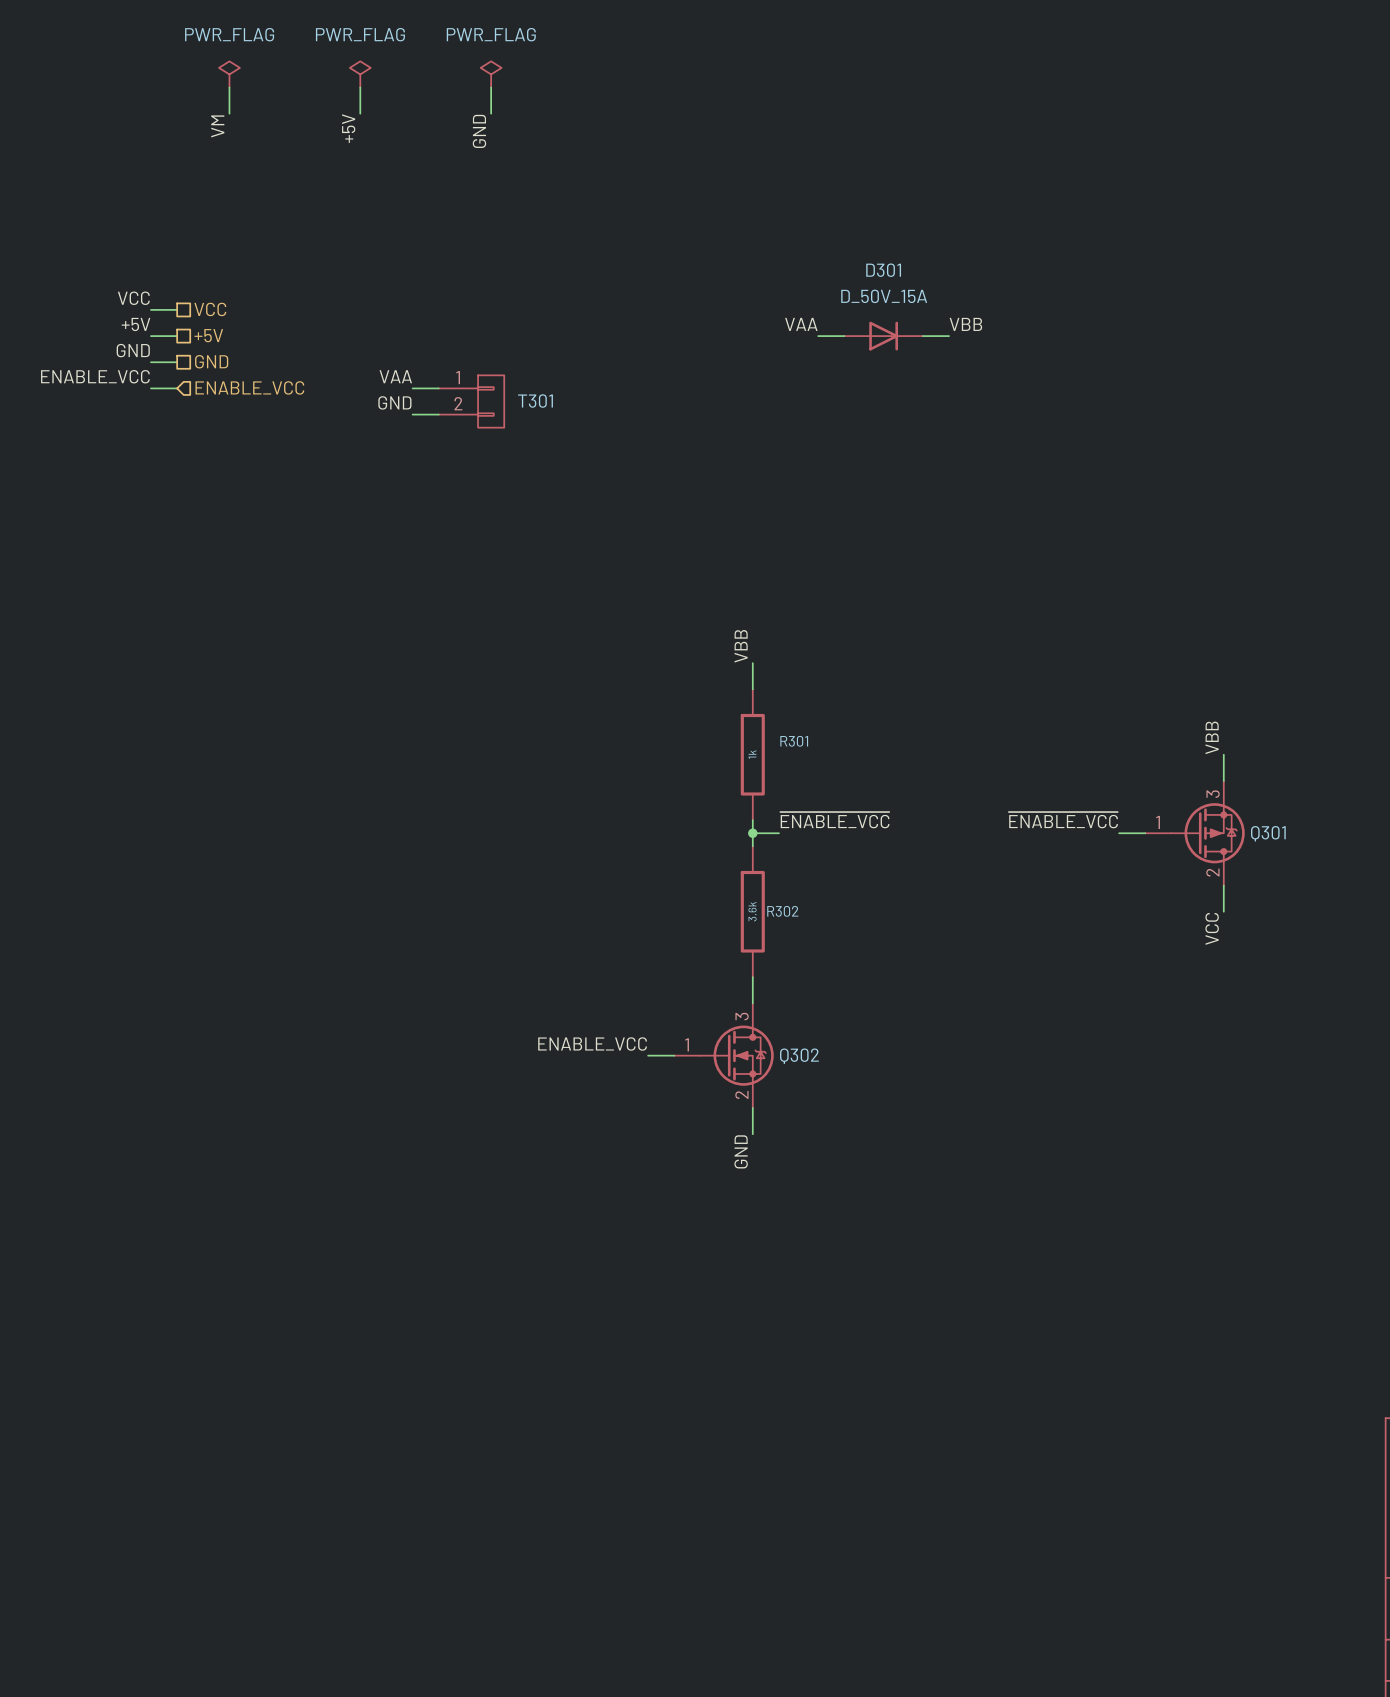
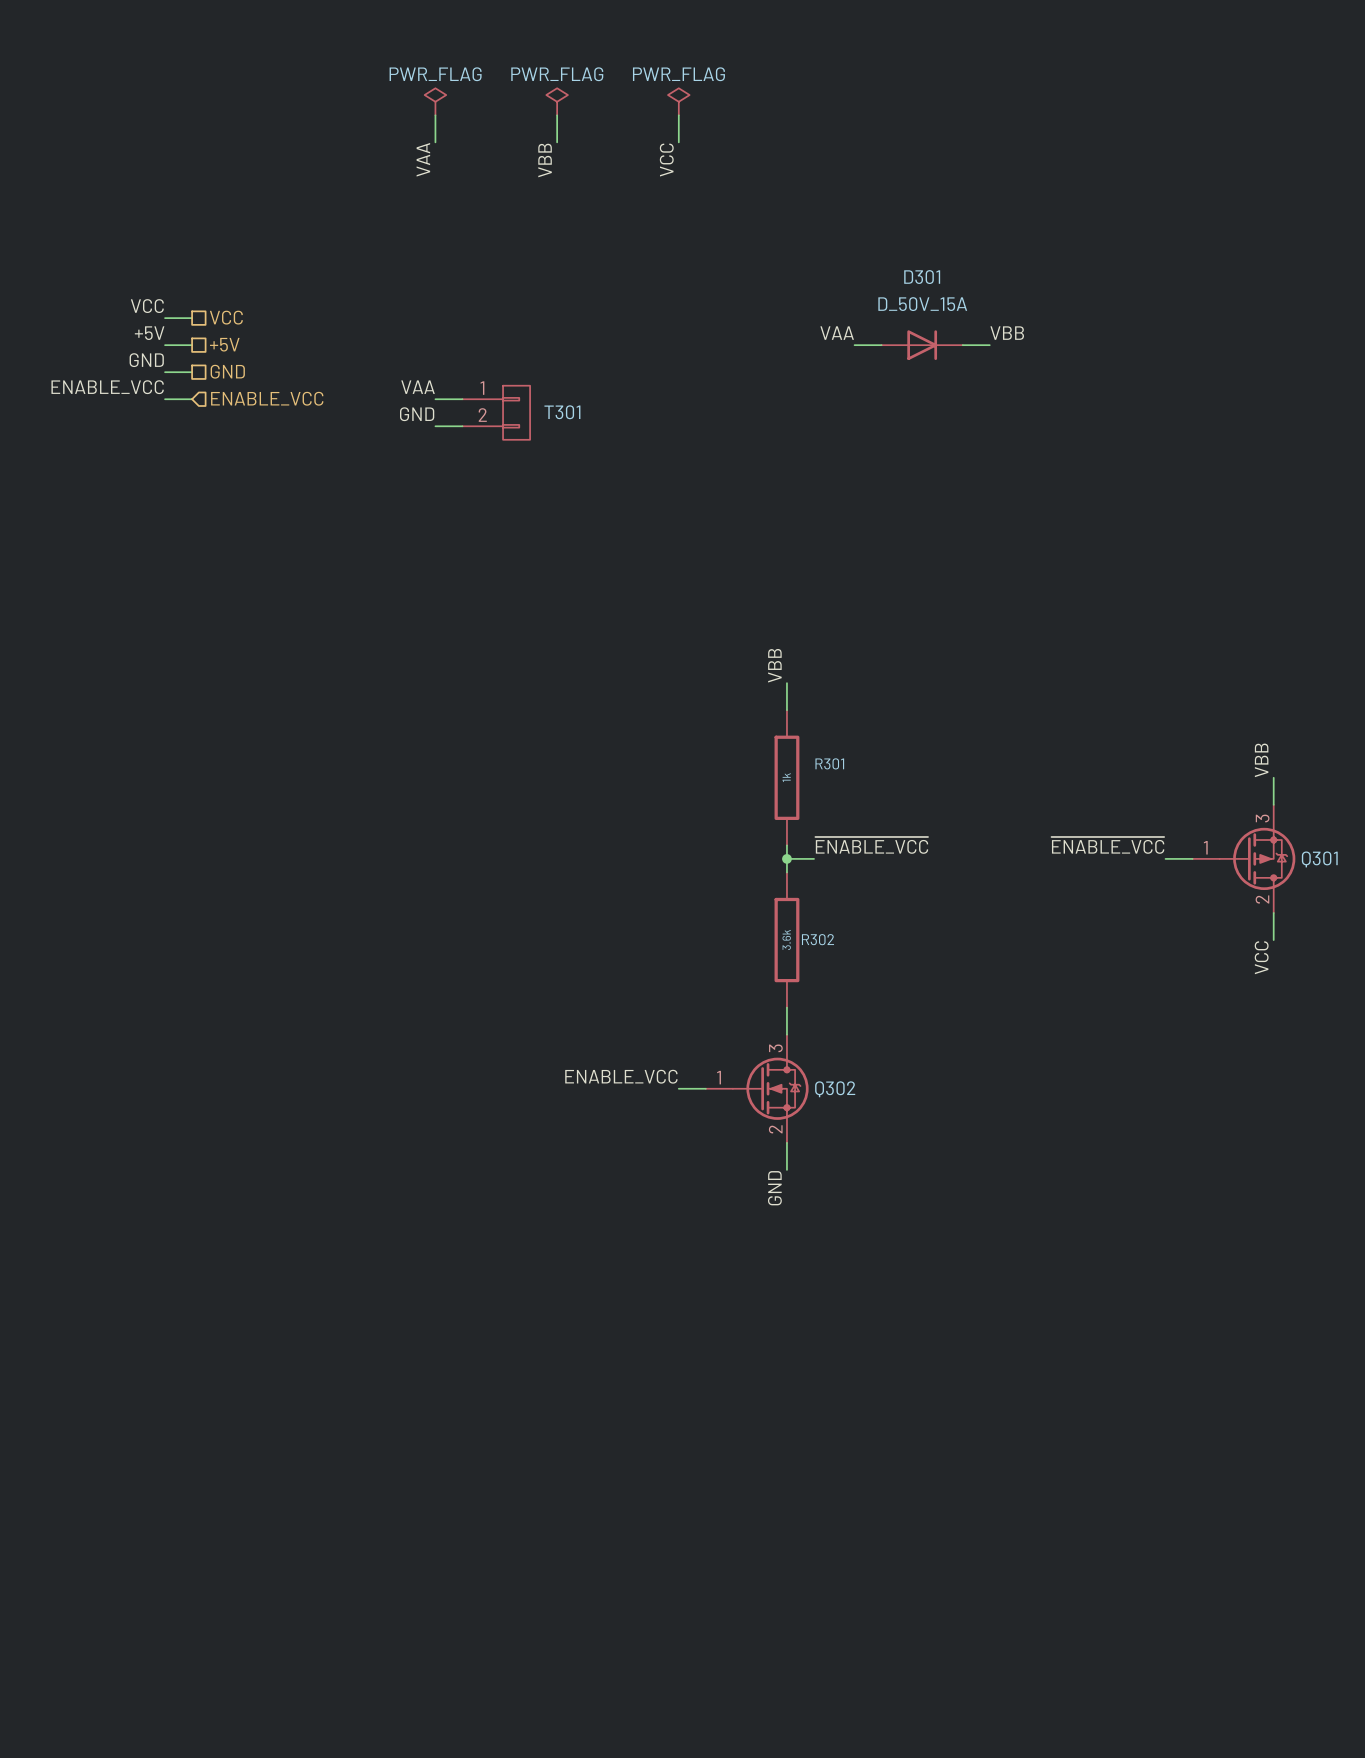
power symbol: PWR_FLAG (229, 74) -> none
power symbol: PWR_FLAG (360, 74) -> none
power symbol: PWR_FLAG (491, 74) -> none
wire: (229, 87) (229, 113) -> none
wire: (360, 87) (360, 113) -> (435, 115) (435, 142)
wire: (491, 87) (491, 113) -> (557, 115) (557, 142)
power symbol: none -> PWR_FLAG (435, 101)
power symbol: none -> PWR_FLAG (557, 101)
power symbol: none -> PWR_FLAG (678, 101)
wire: none -> (678, 115) (678, 142)
label: VM (217, 126) -> none
label: +5V (348, 128) -> none
label: GND (479, 131) -> none
label: none -> VAA (423, 159)
label: none -> VCC (666, 160)
label: none -> VBB (545, 160)

